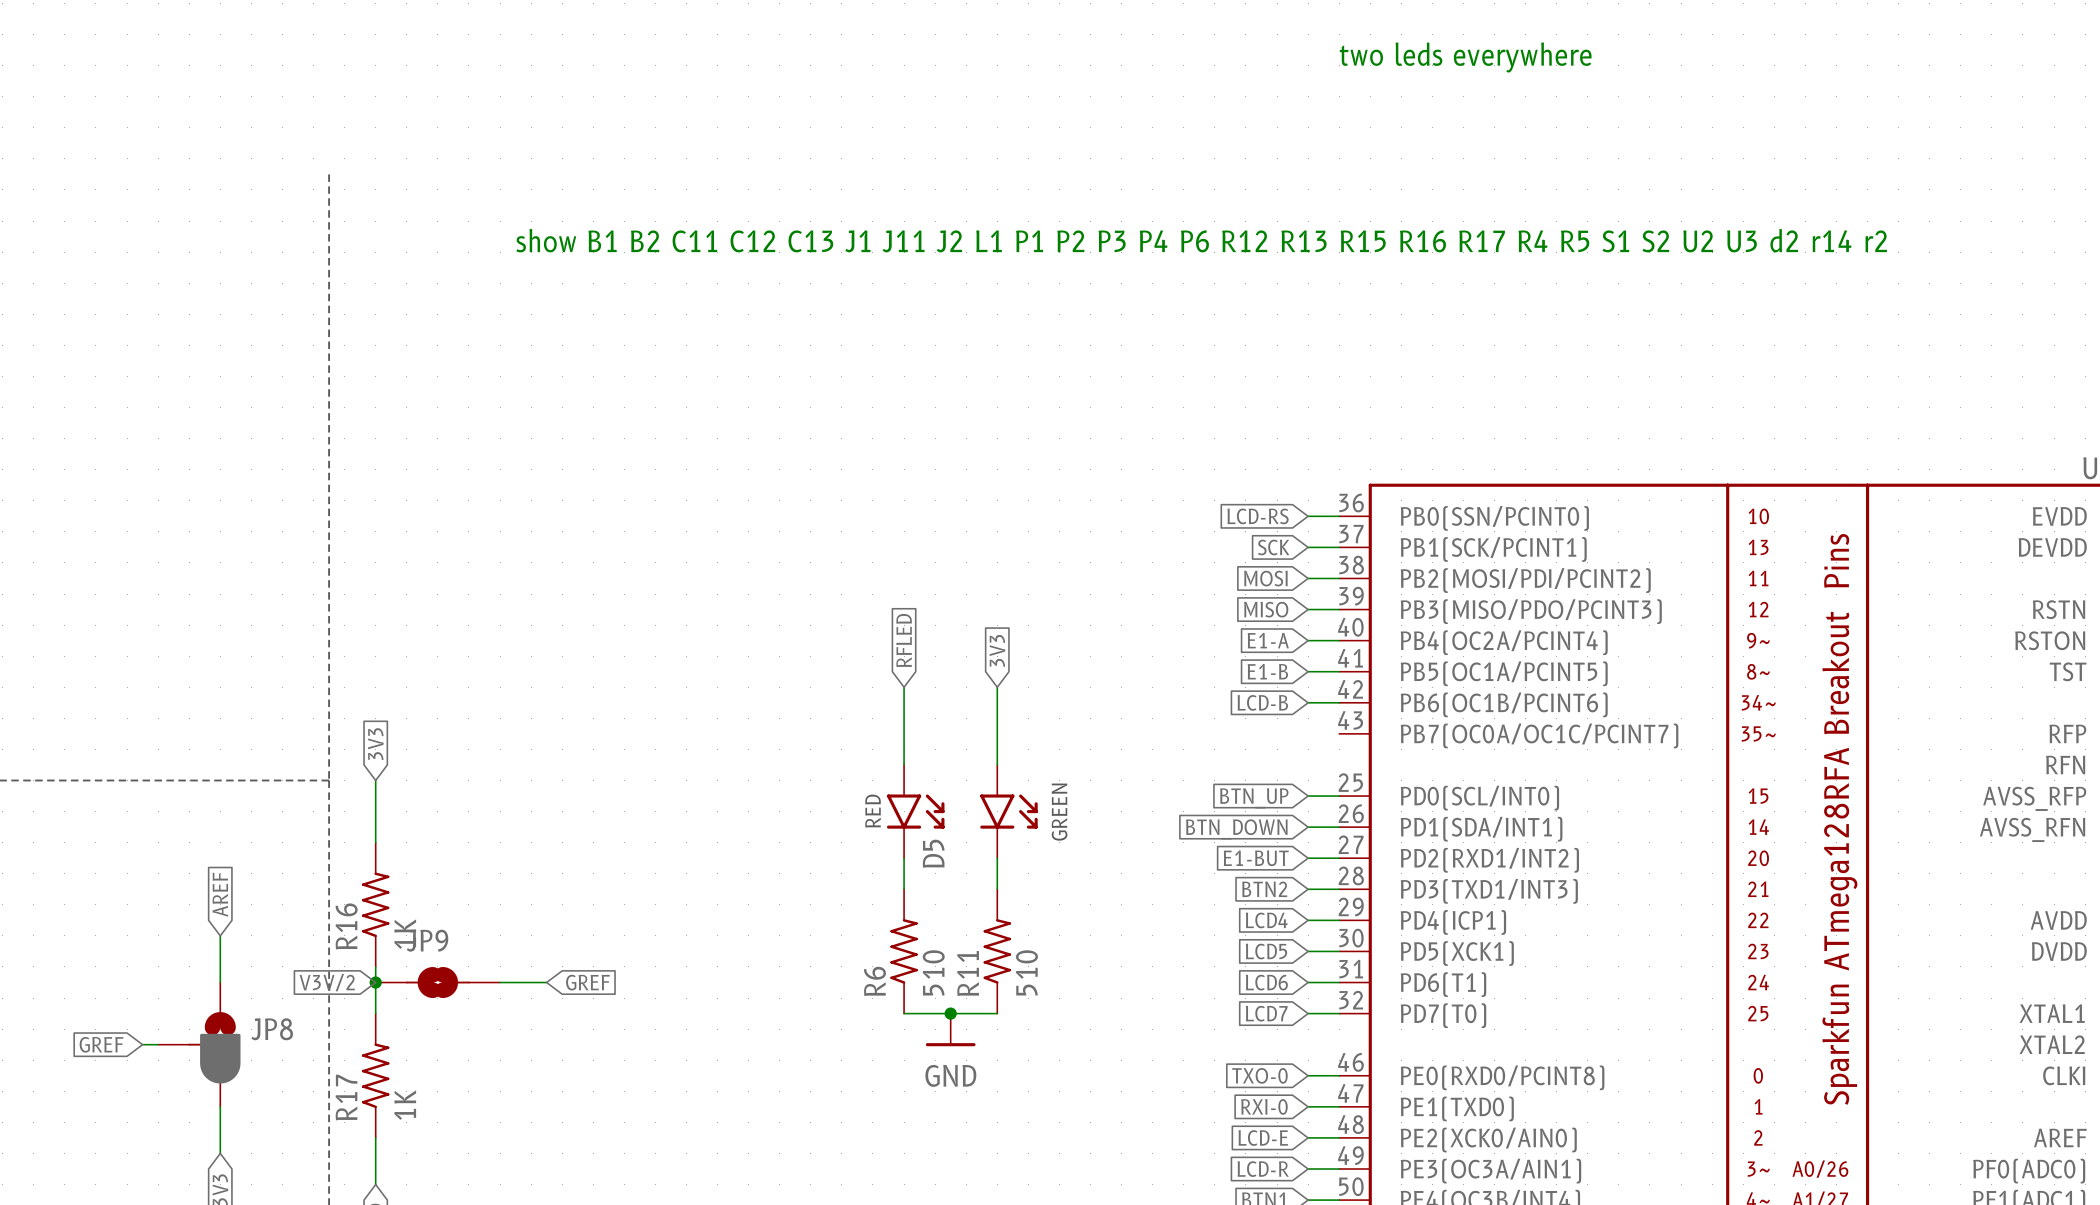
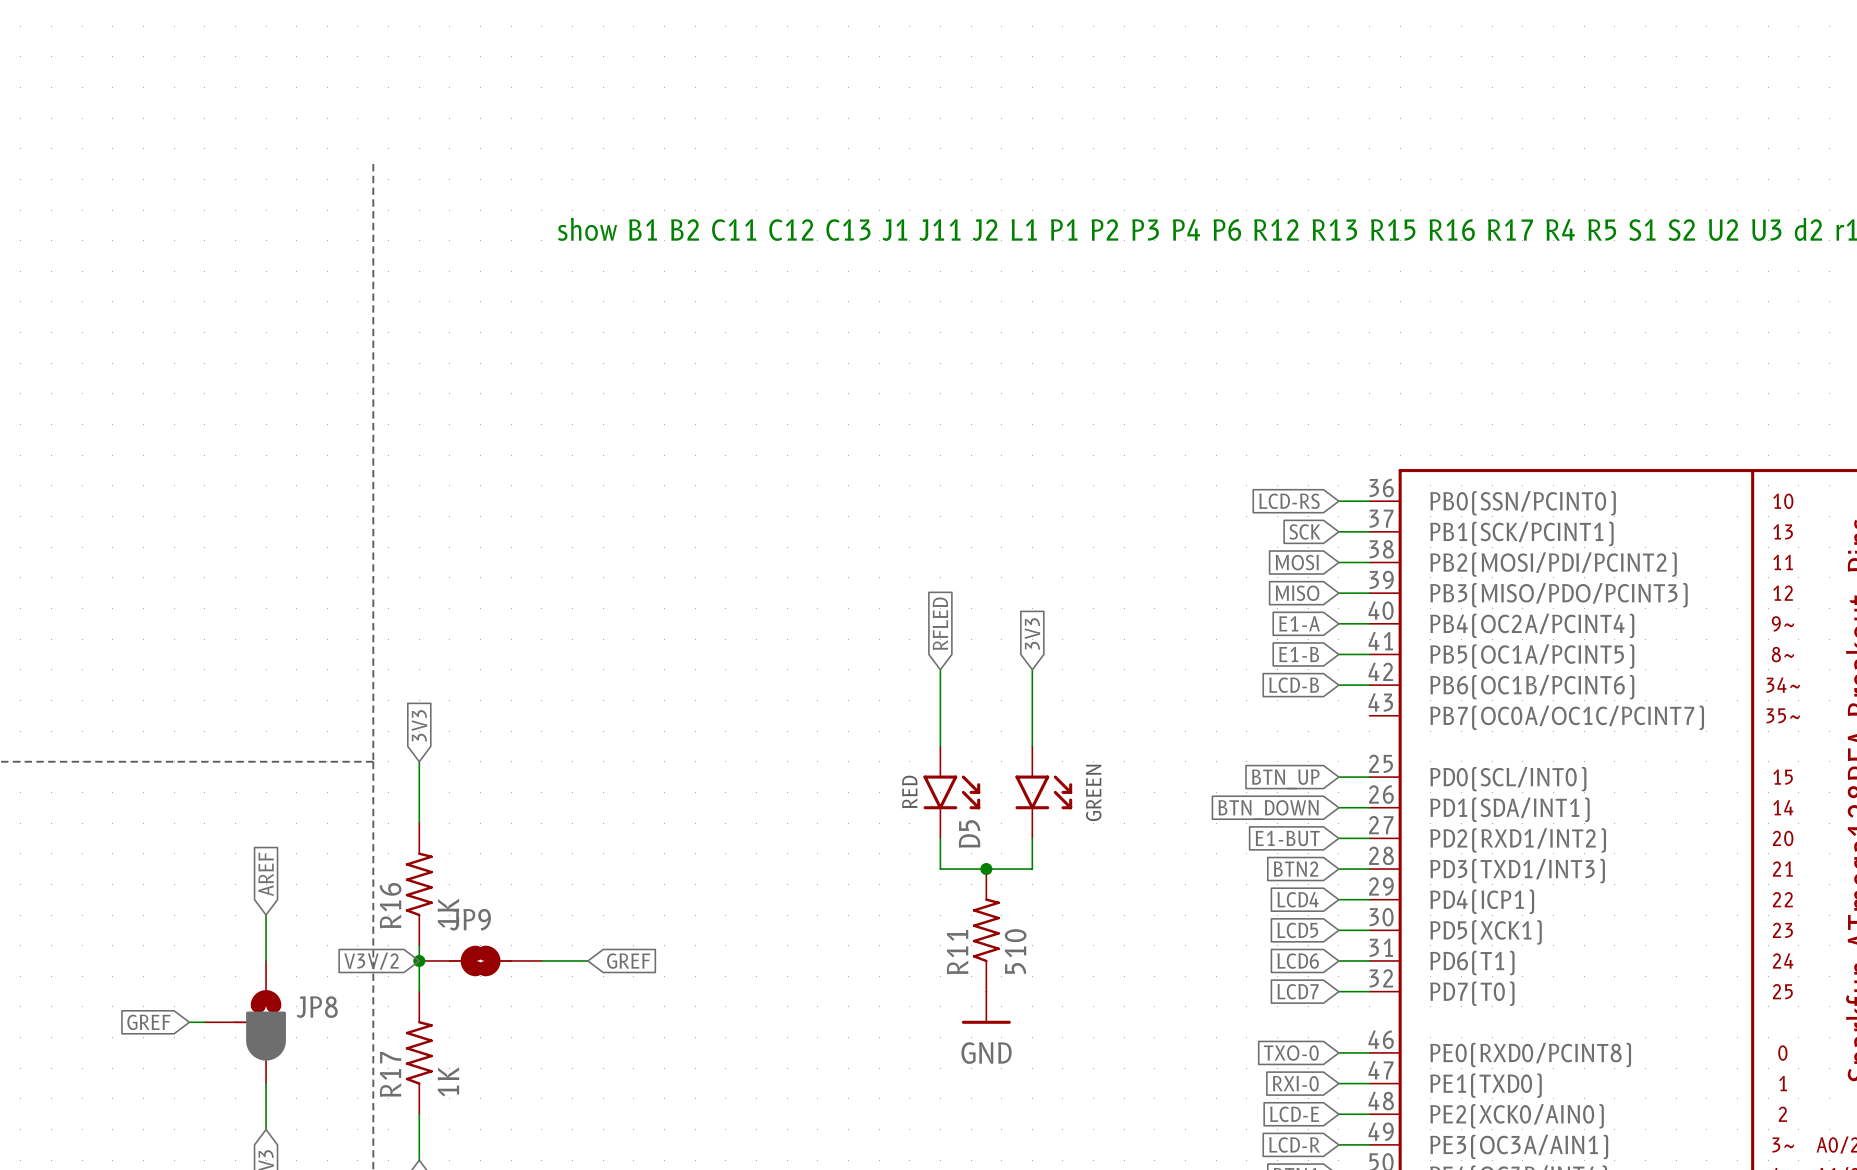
text: two leds everywhere (1465, 57) -> none
junction: none -> (986, 869)
R6: 510 (904, 951) -> none
R11 position: (997, 951) -> (986, 930)
wire: (904, 1013) (997, 1013) -> (940, 869) (1032, 869)
junction: (950, 1013) -> none

